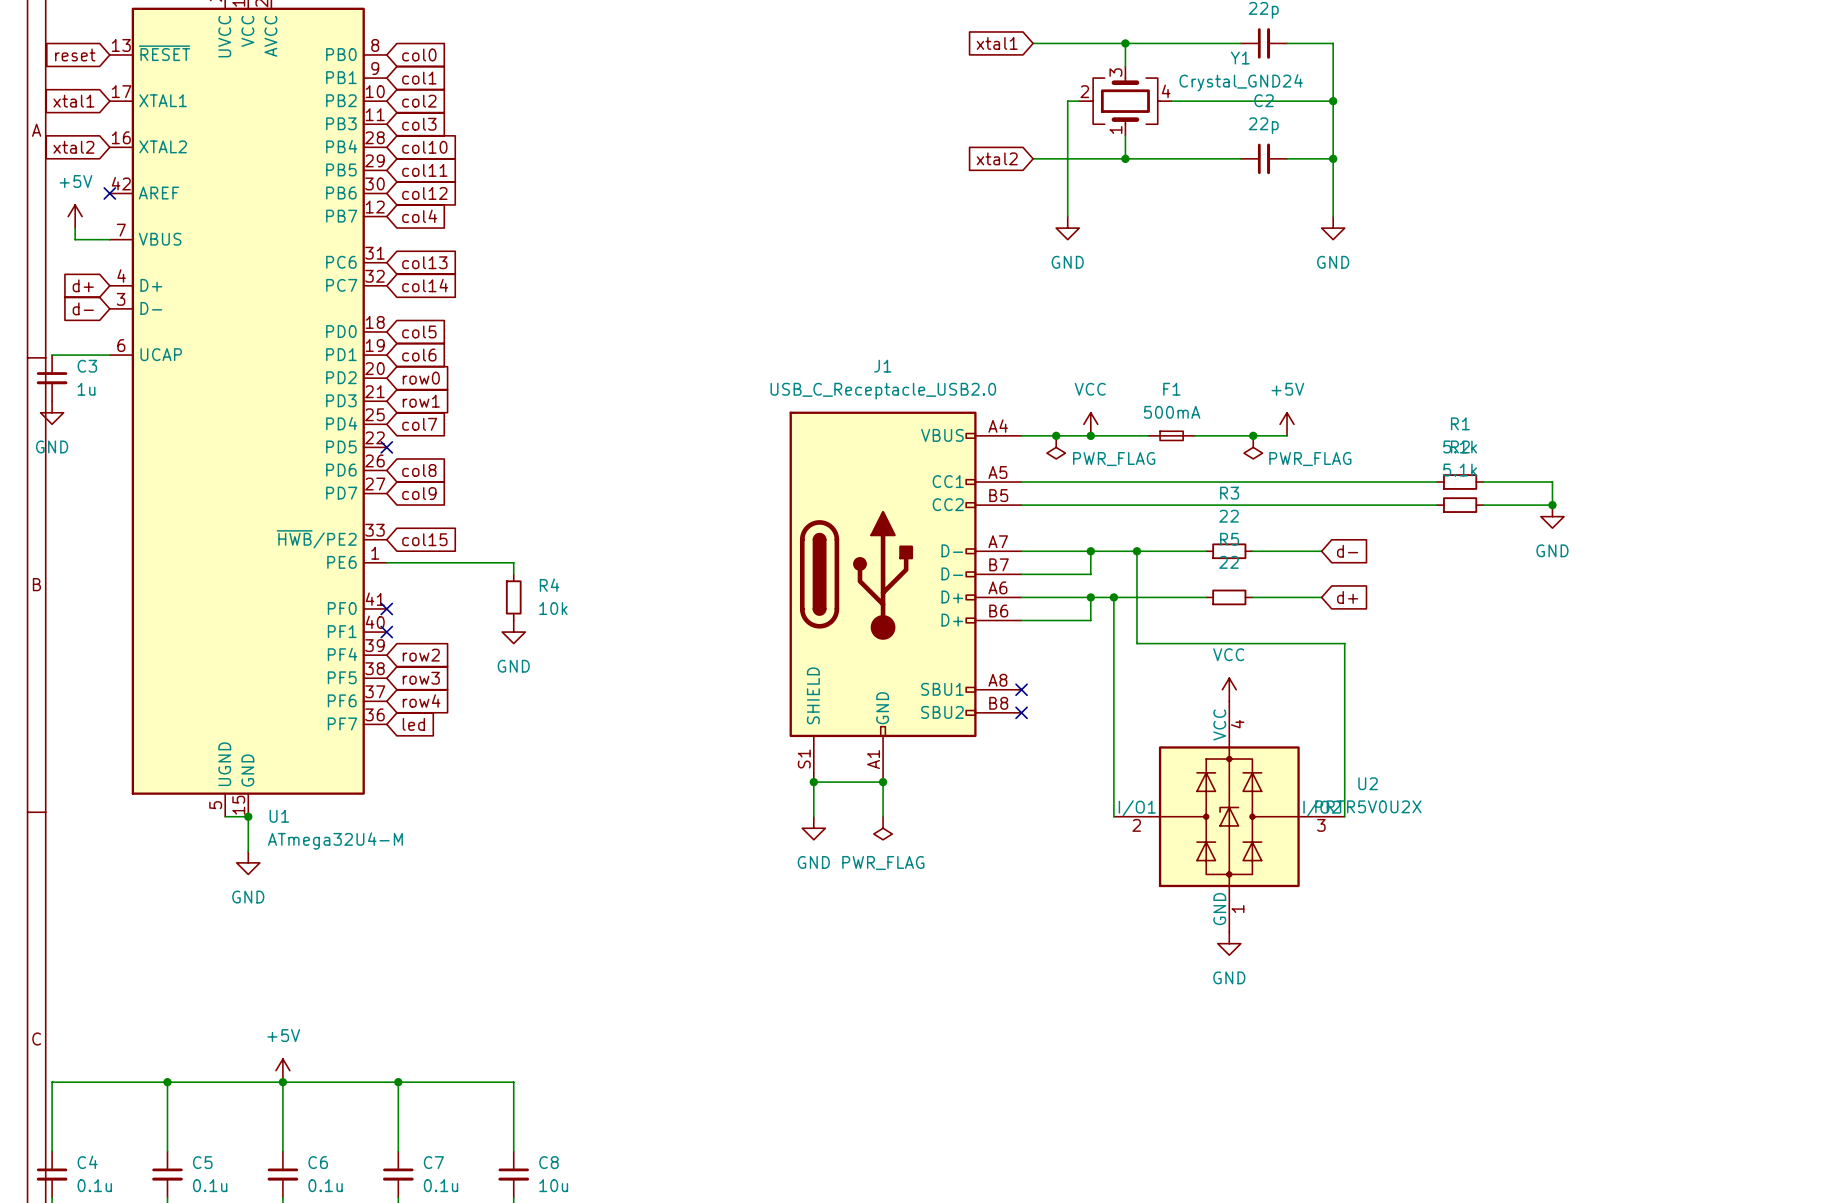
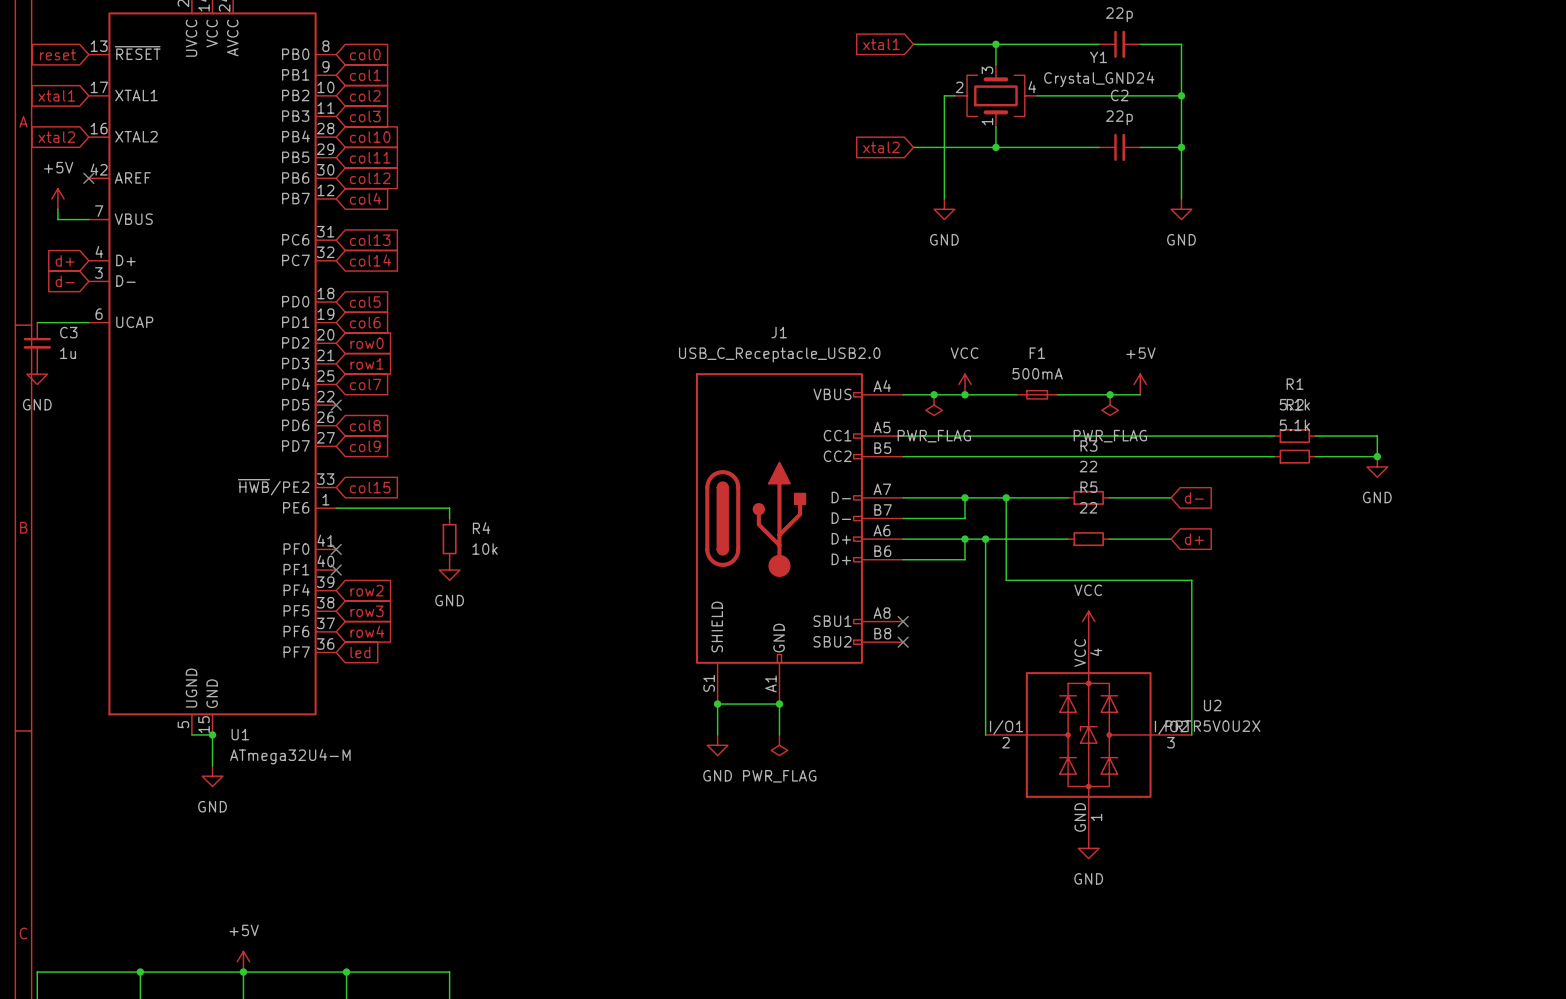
power symbol text position: PWR_FLAG (1114, 459) -> PWR_FLAG (934, 436)
power symbol text position: PWR_FLAG (1310, 459) -> PWR_FLAG (1110, 436)

